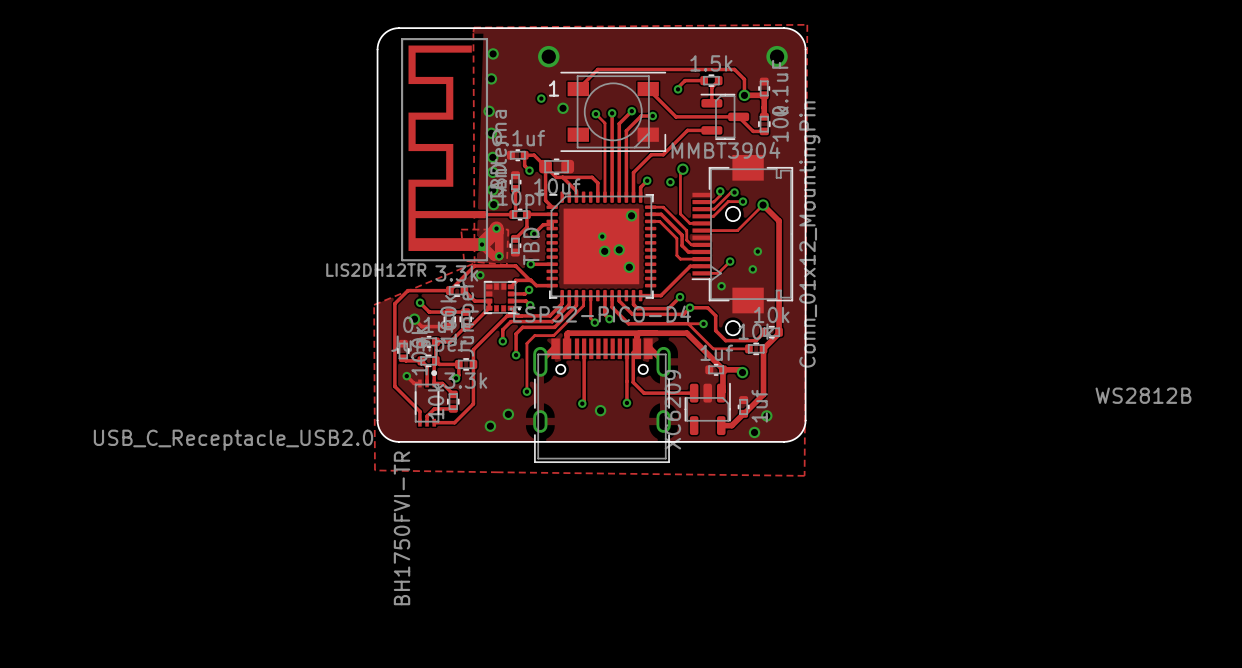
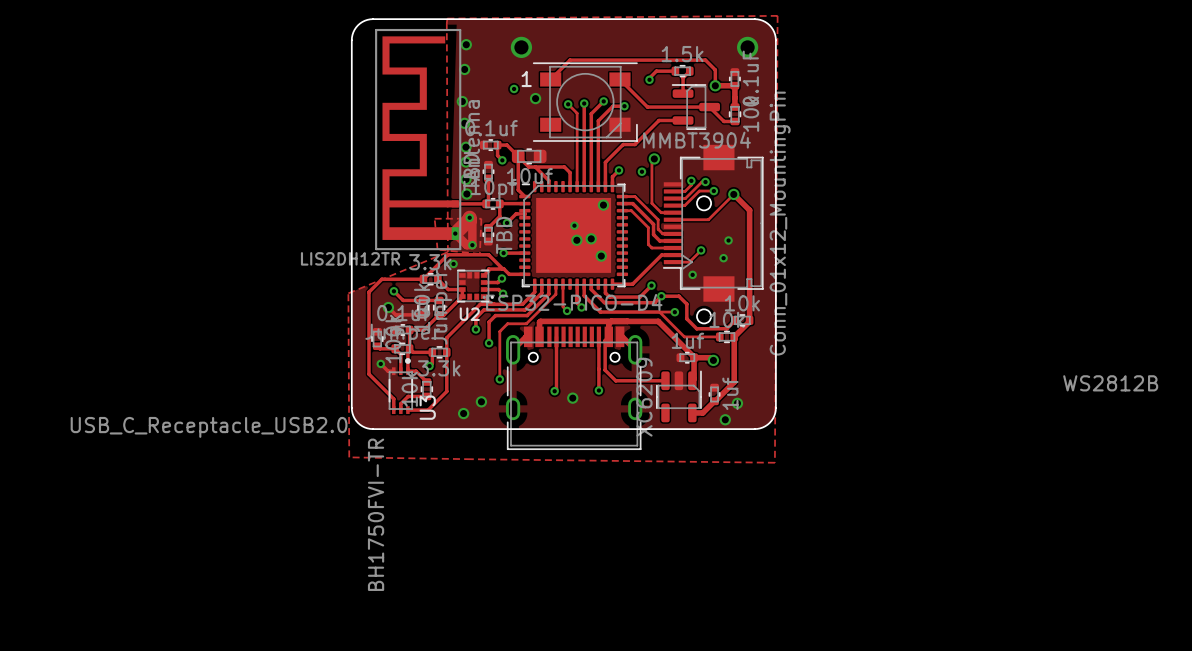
U2 name: none -> U2 (469, 314)
U3 name: none -> U3 (427, 407)

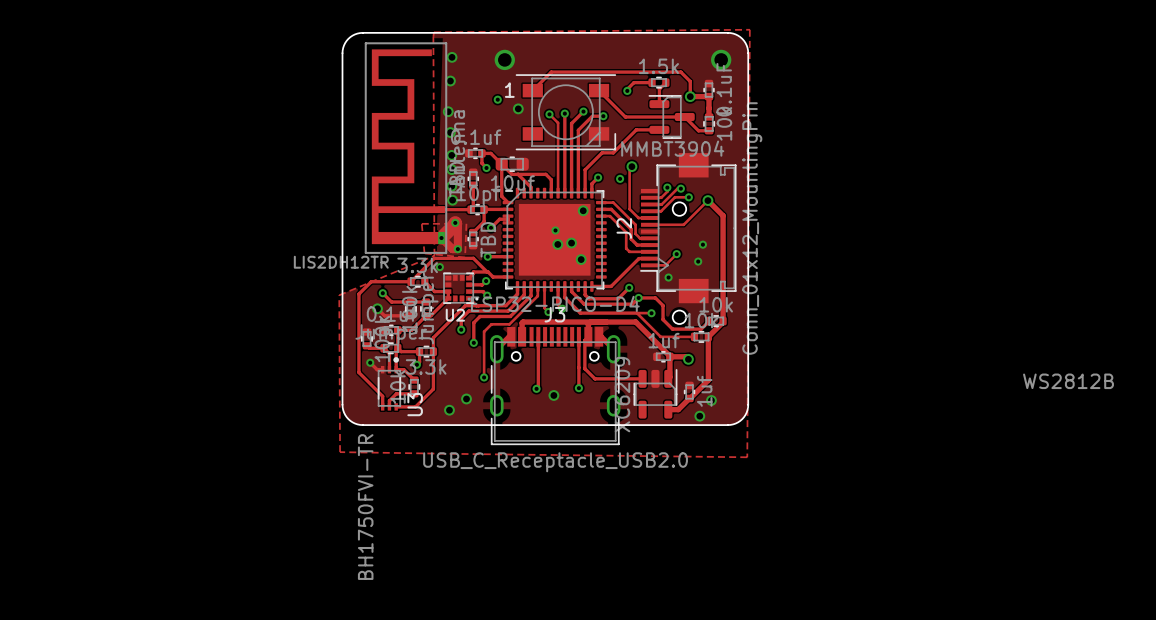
J2 name: none -> J2 (624, 228)
J3 name: none -> J3 (554, 314)
J3 value position: USB_C_Receptacle_USB2.0 (209, 427) -> USB_C_Receptacle_USB2.0 (555, 462)

